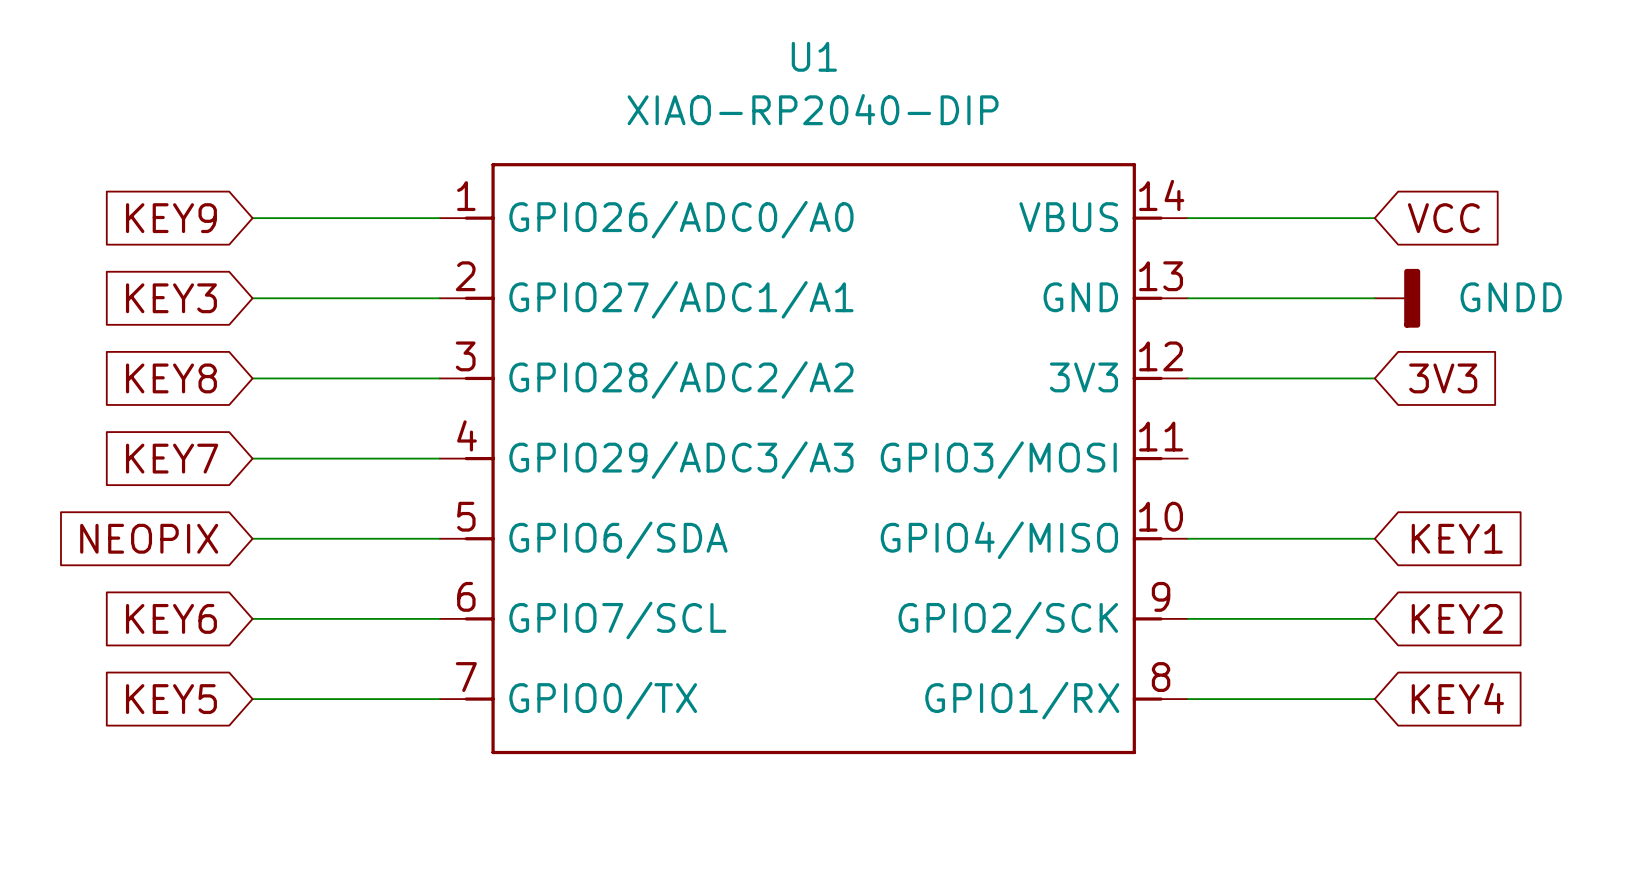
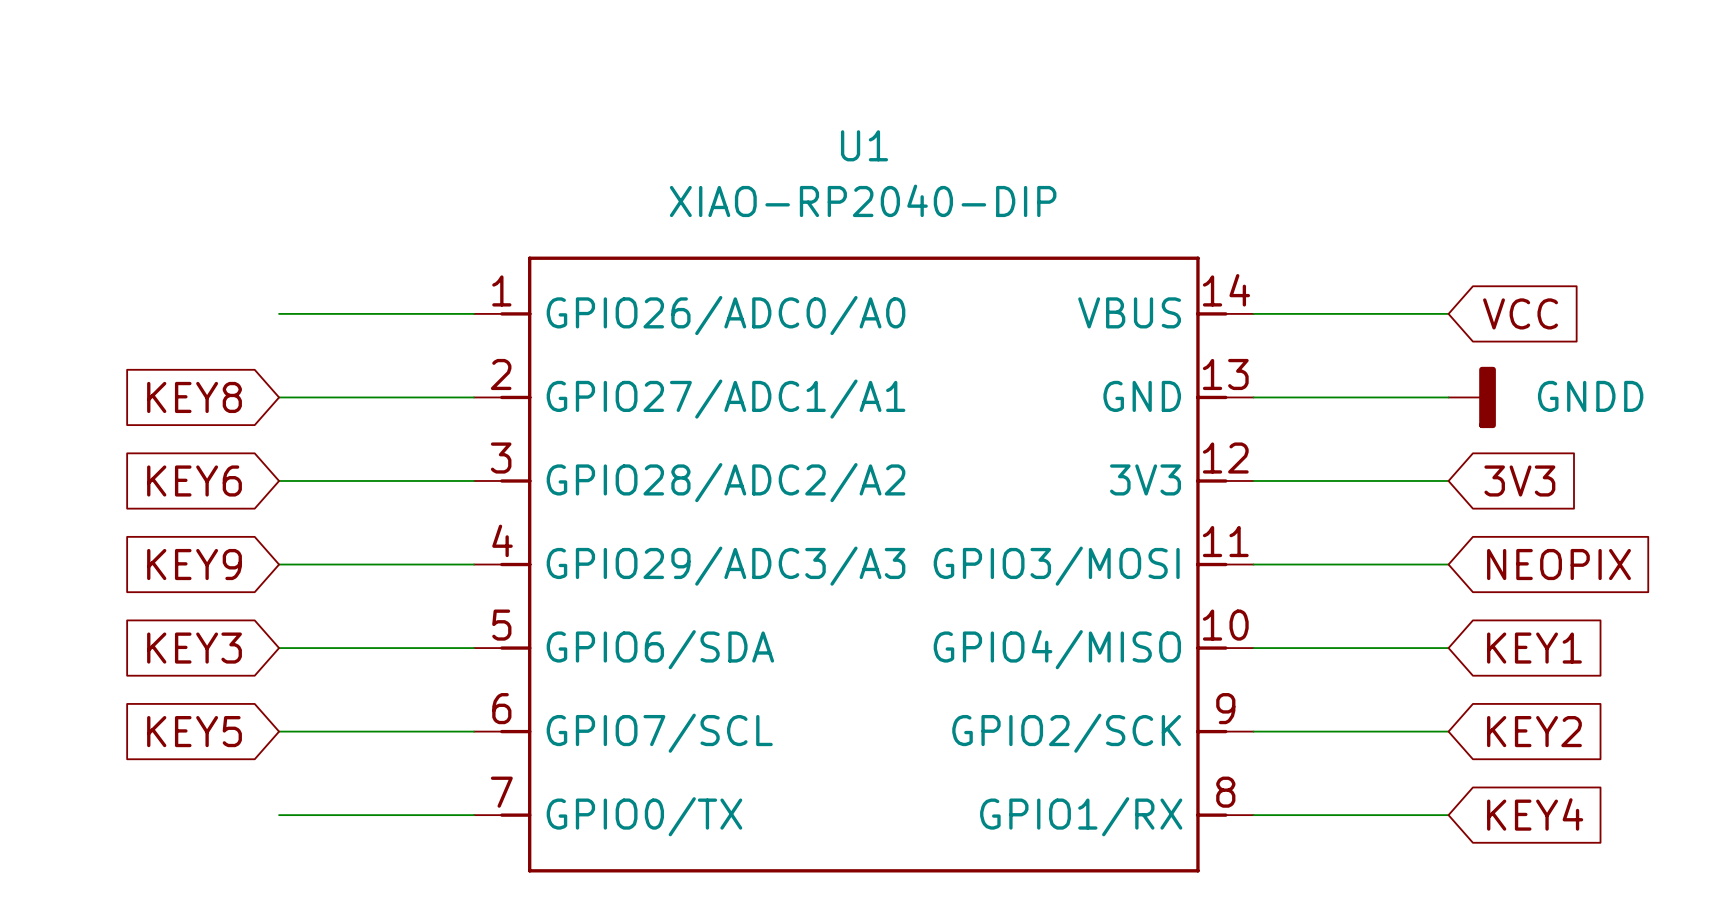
global label: KEY9 (171, 218) -> none
wire: (252, 218) (439, 218) -> none
wire: (1187, 218) (1374, 218) -> (1253, 480) (1448, 480)
global label position: VCC (1443, 218) -> VCC (1520, 313)
global label: KEY3 (171, 298) -> none
power symbol position: GNDD (1397, 298) -> GNDD (1472, 397)
global label position: 3V3 (1443, 378) -> 3V3 (1519, 480)
global label: KEY7 (172, 458) -> KEY6 (194, 480)
U1 position: (813, 458) -> (863, 564)
global label: NEOPIX (149, 538) -> KEY9 (194, 564)
global label: KEY1 (1457, 538) -> NEOPIX (1558, 564)
global label: KEY6 (171, 618) -> KEY3 (194, 648)
global label: KEY2 (1457, 618) -> KEY1 (1534, 648)
global label: KEY4 (1457, 698) -> KEY2 (1534, 731)
global label: none -> KEY4 (1535, 814)
wire: none -> (279, 815) (474, 815)
wire: none -> (1253, 815) (1448, 815)

